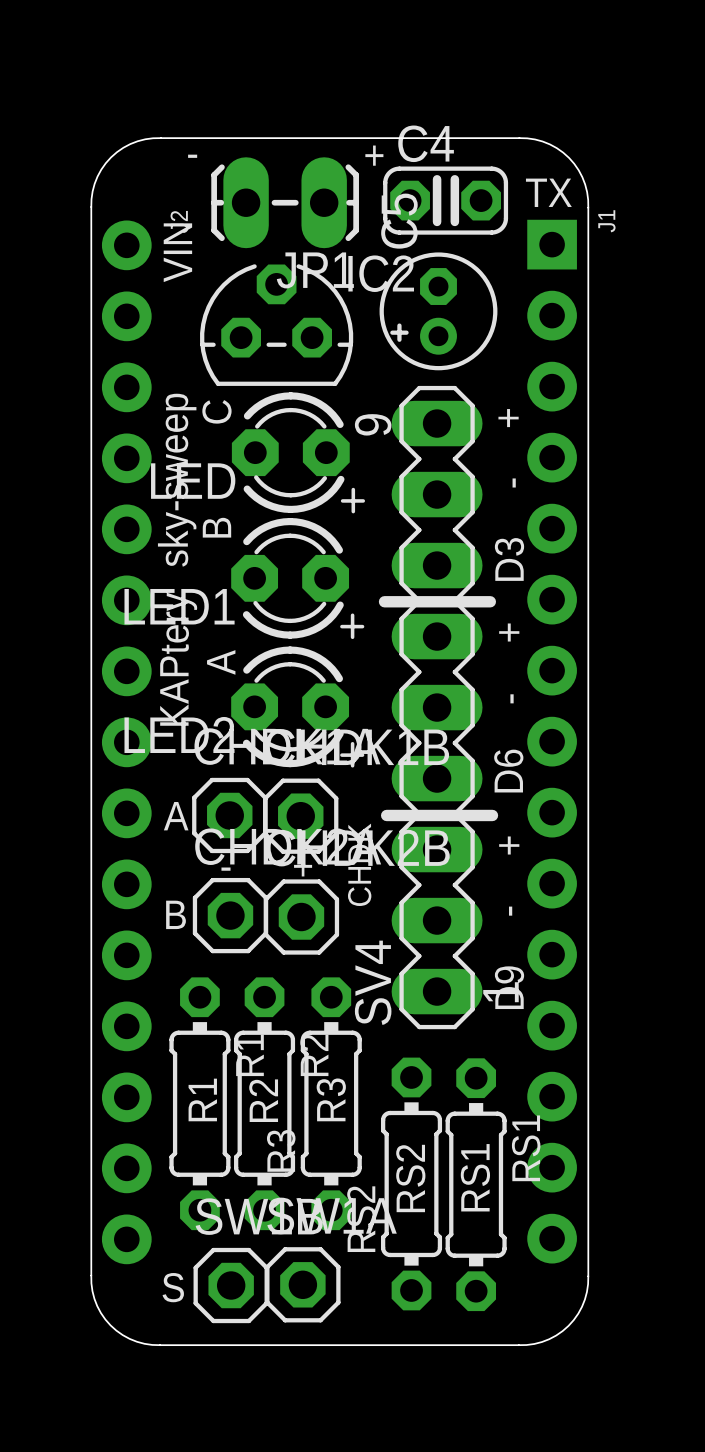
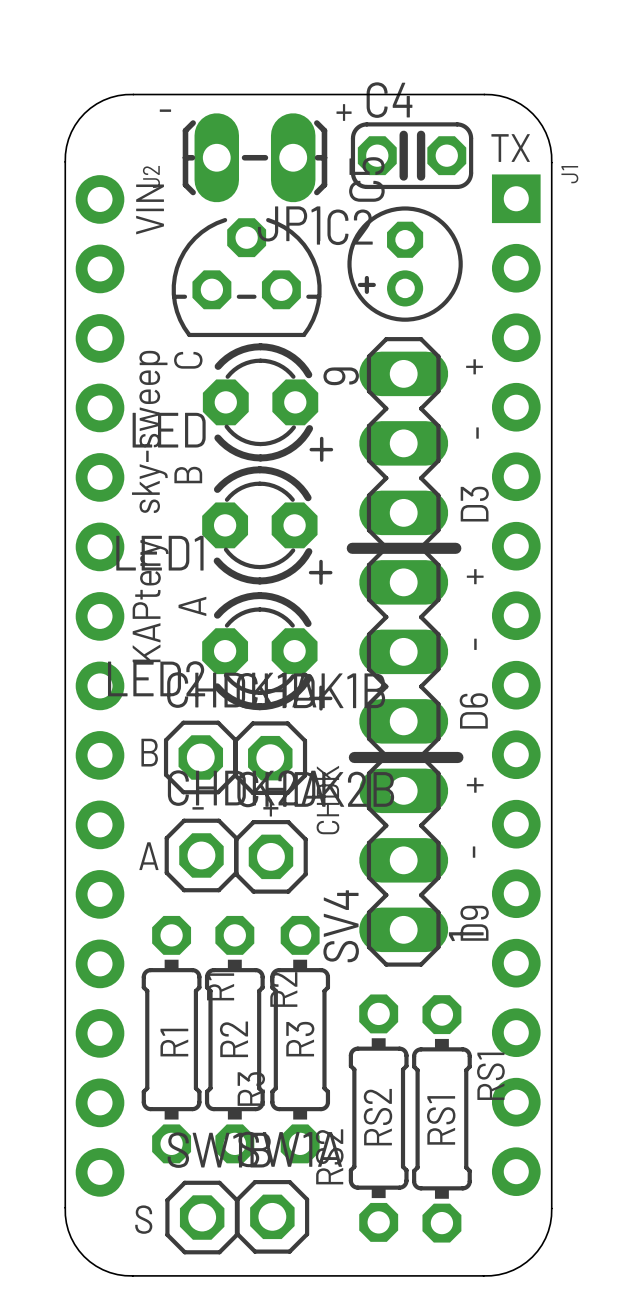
text: A (176, 816) -> B (149, 752)
text: B (176, 914) -> A (148, 856)

